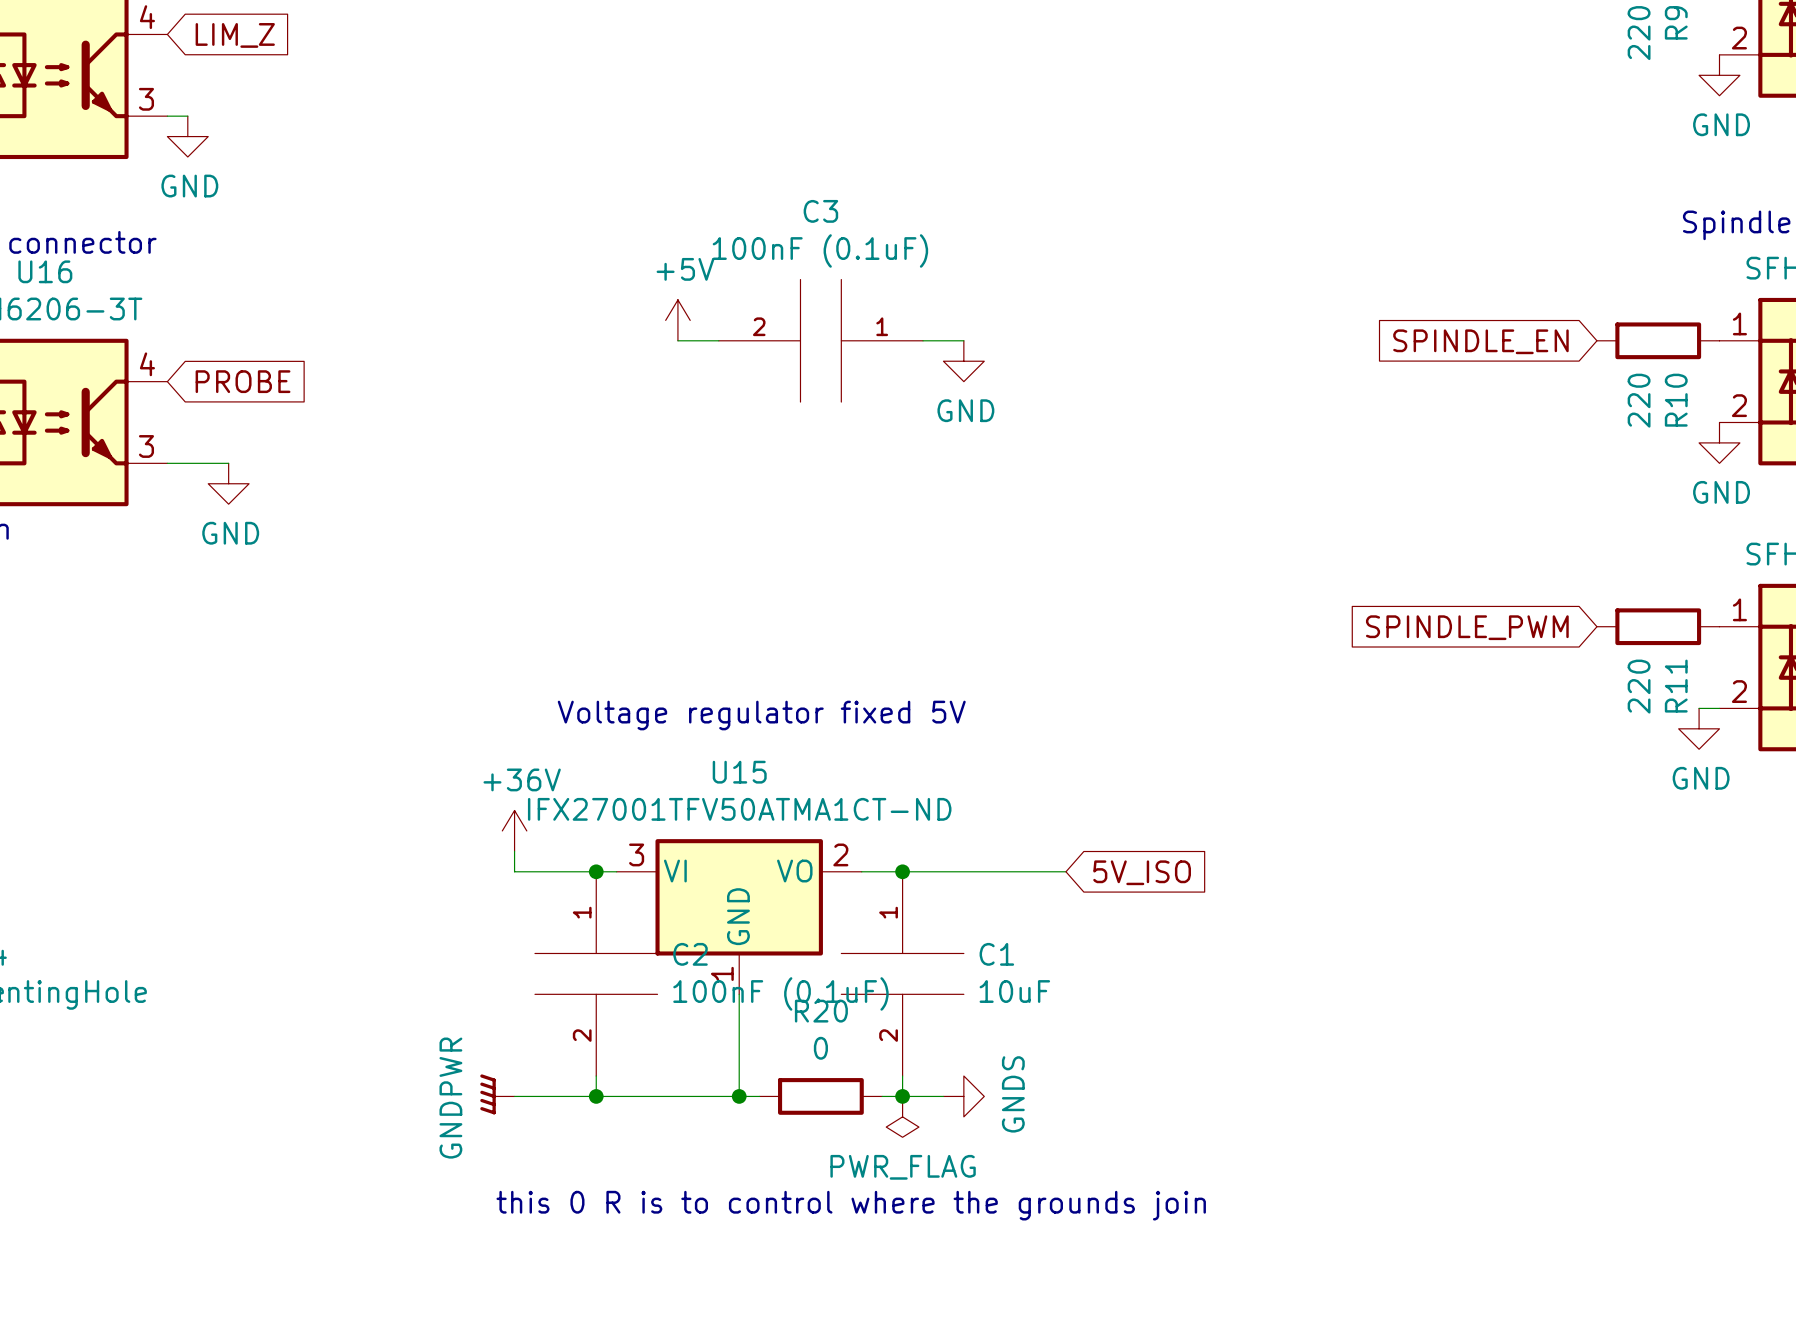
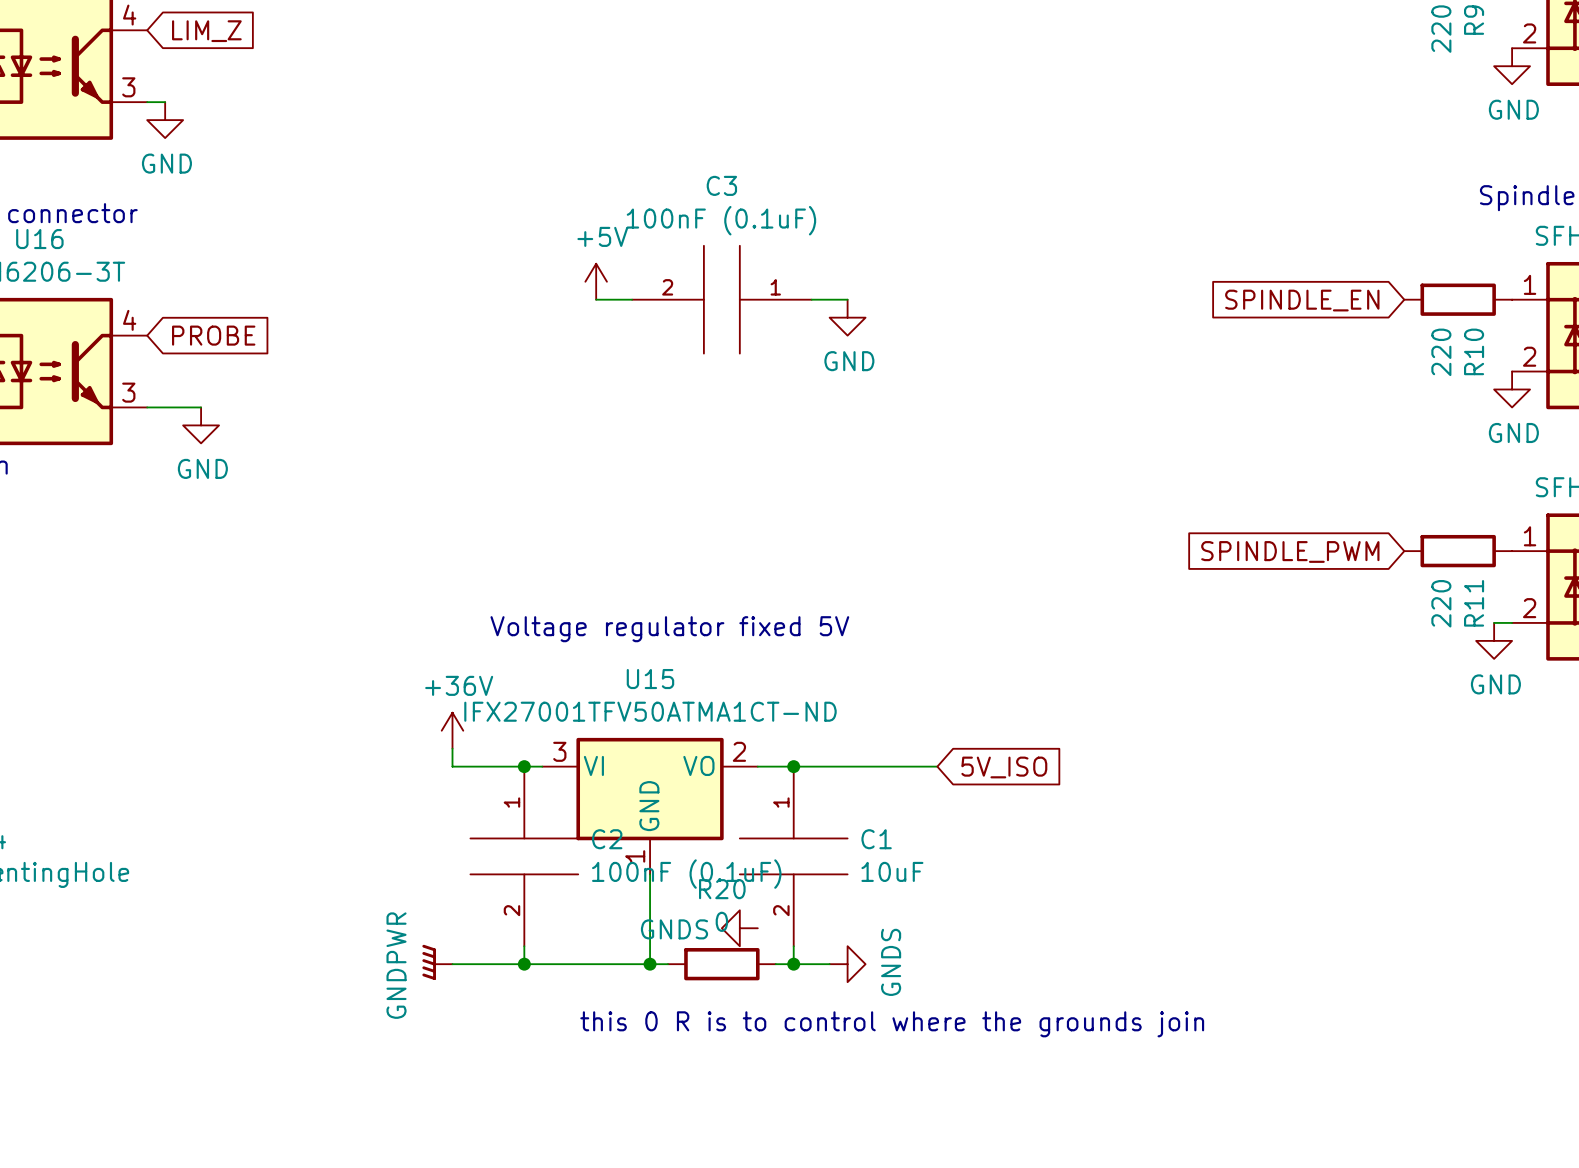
power symbol: none -> GNDS (739, 928)
power symbol: PWR_FLAG (902, 1116) -> none
text position: this 0 R is to control where the grounds join (851, 1205) -> this 0 R is to control where the grounds join (892, 1024)

